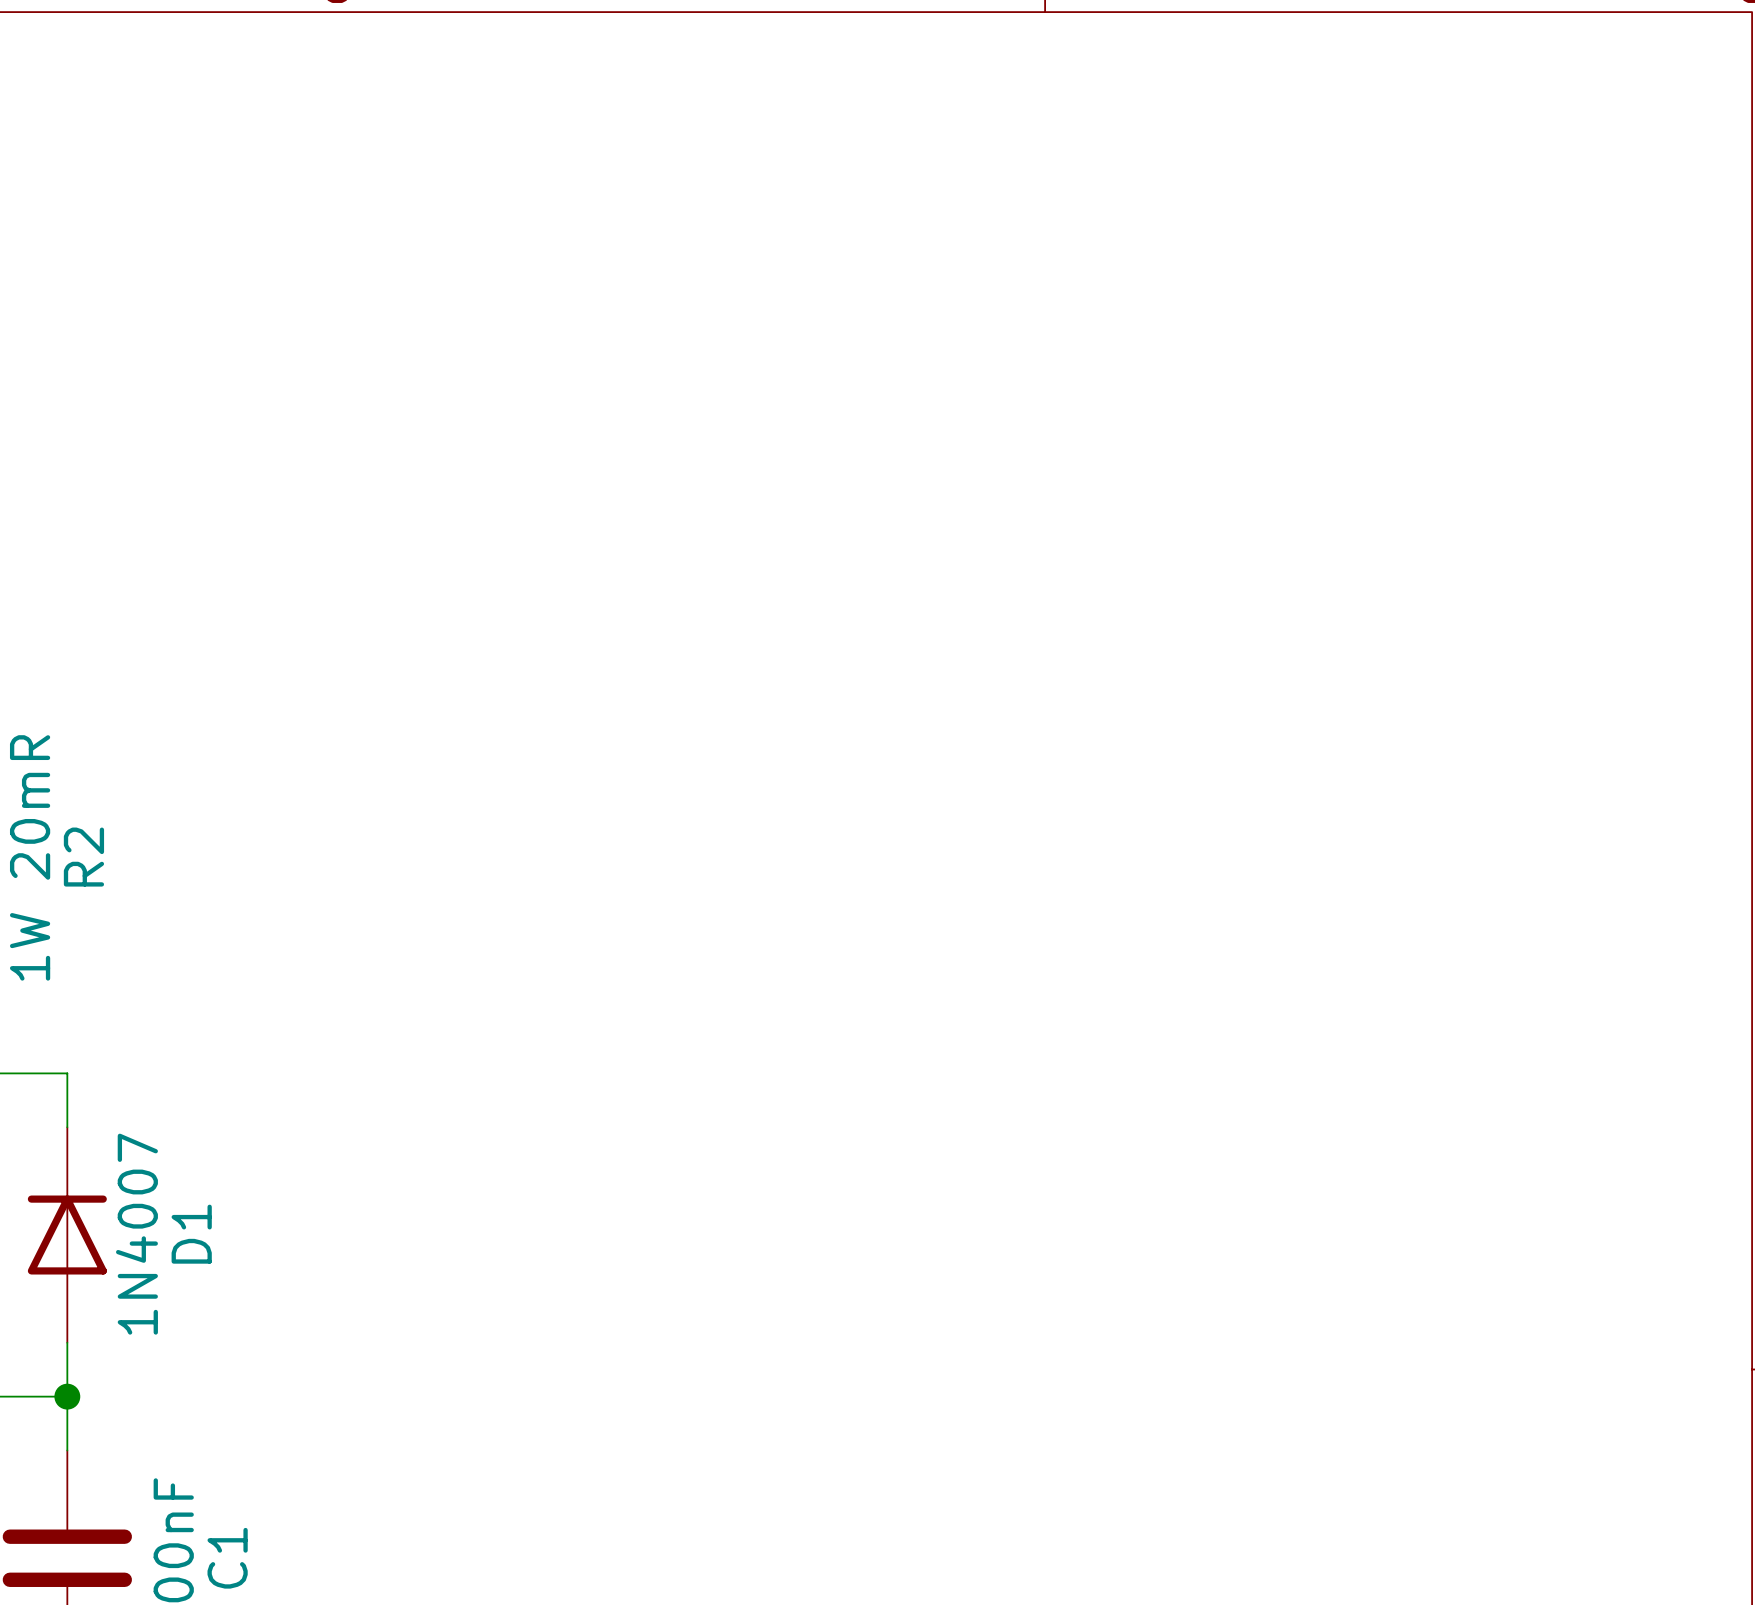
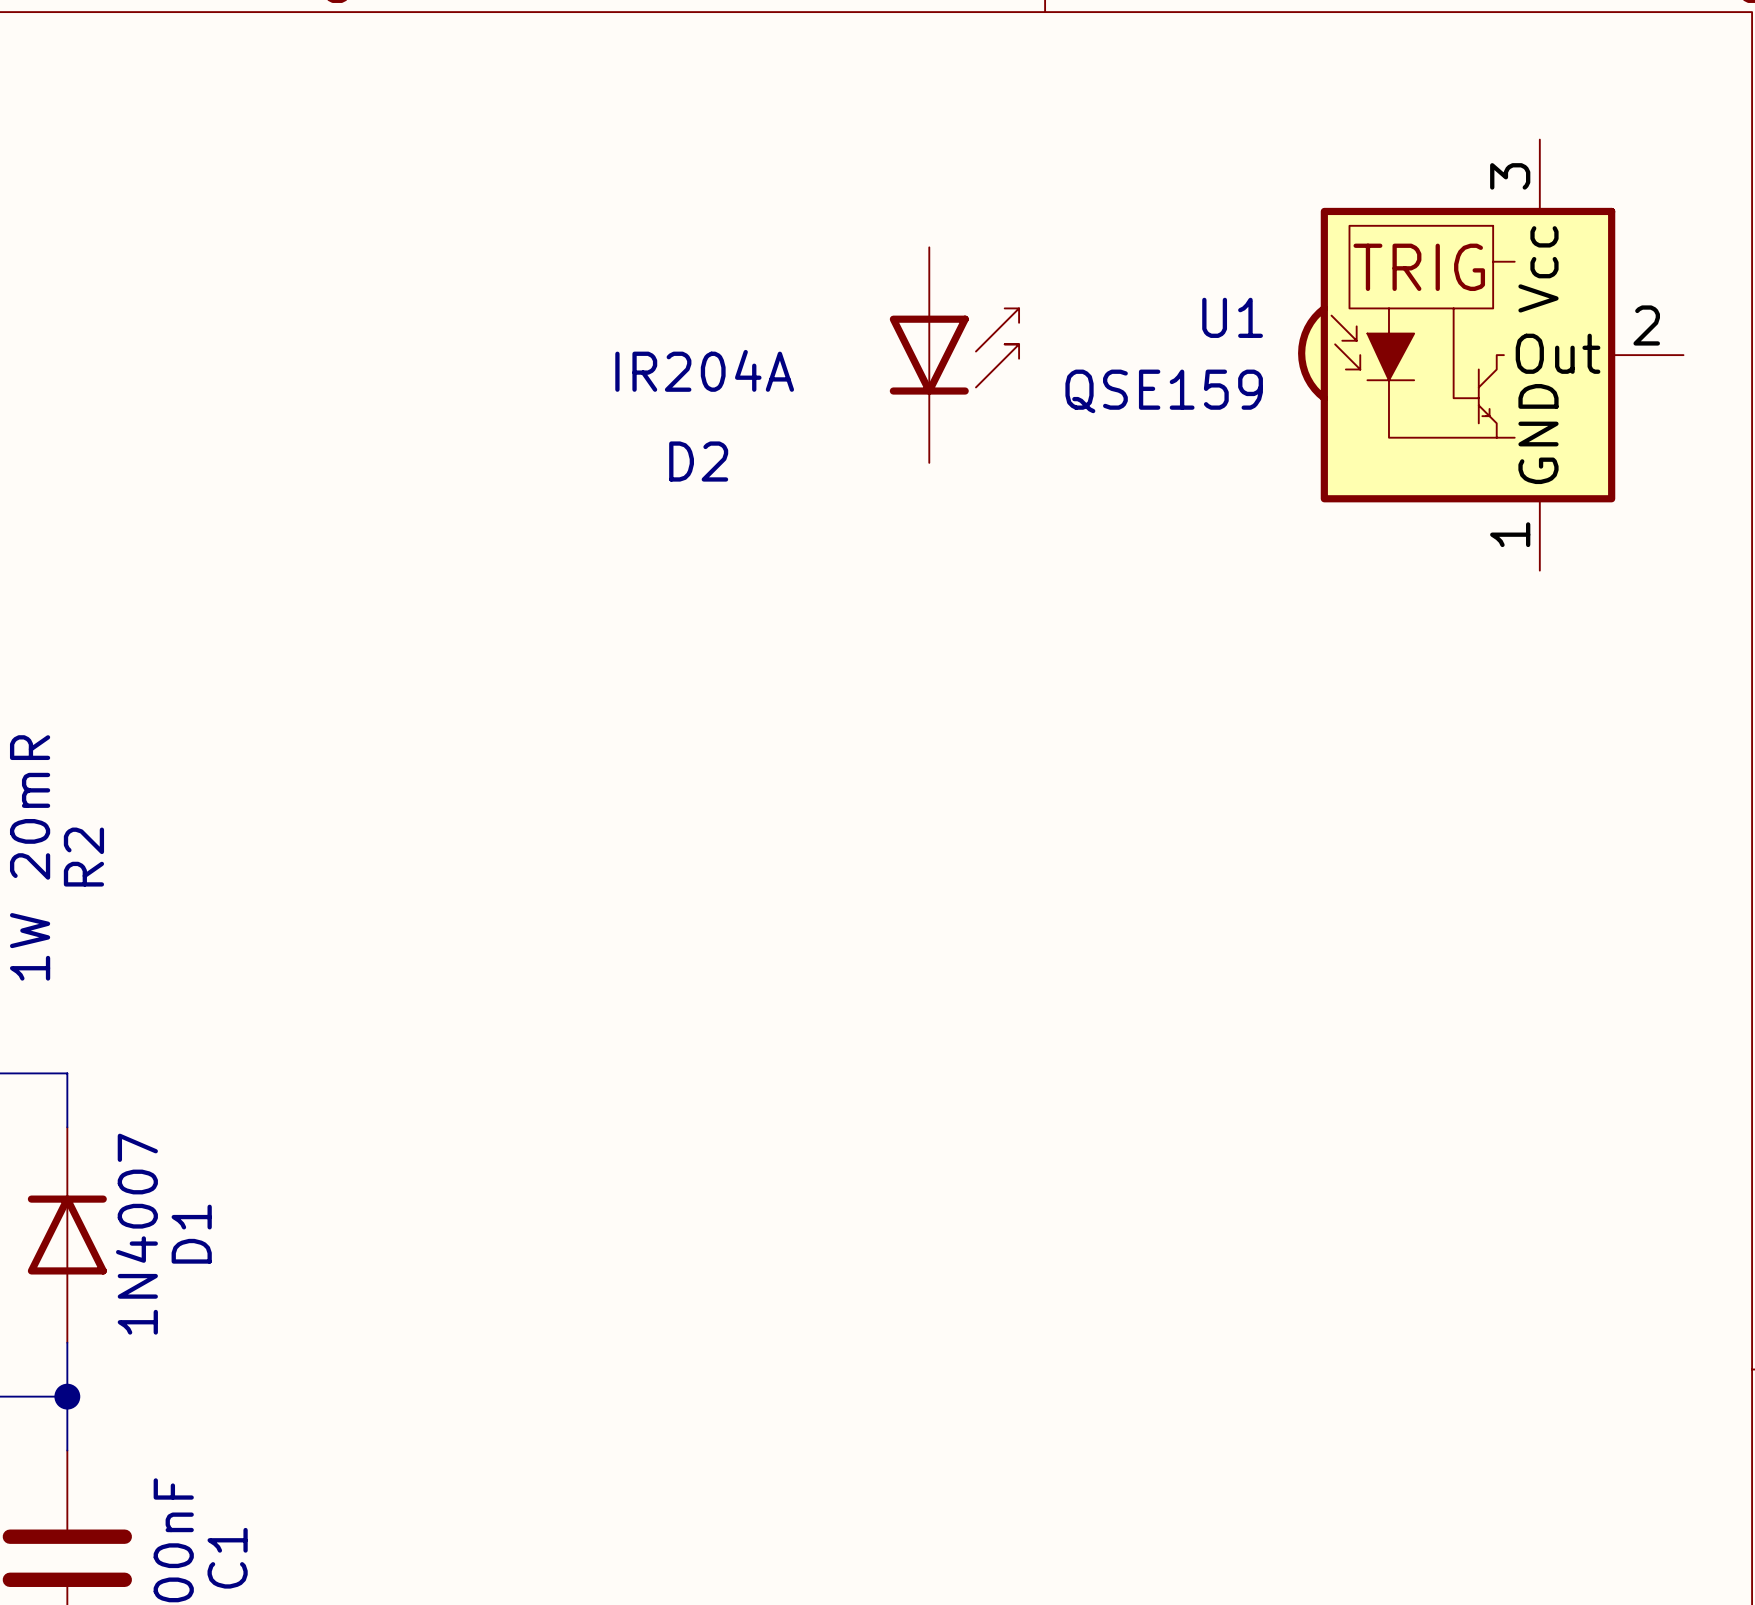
D2: none -> IR204A (954, 355)
U1: none -> QSE159 (1490, 355)

